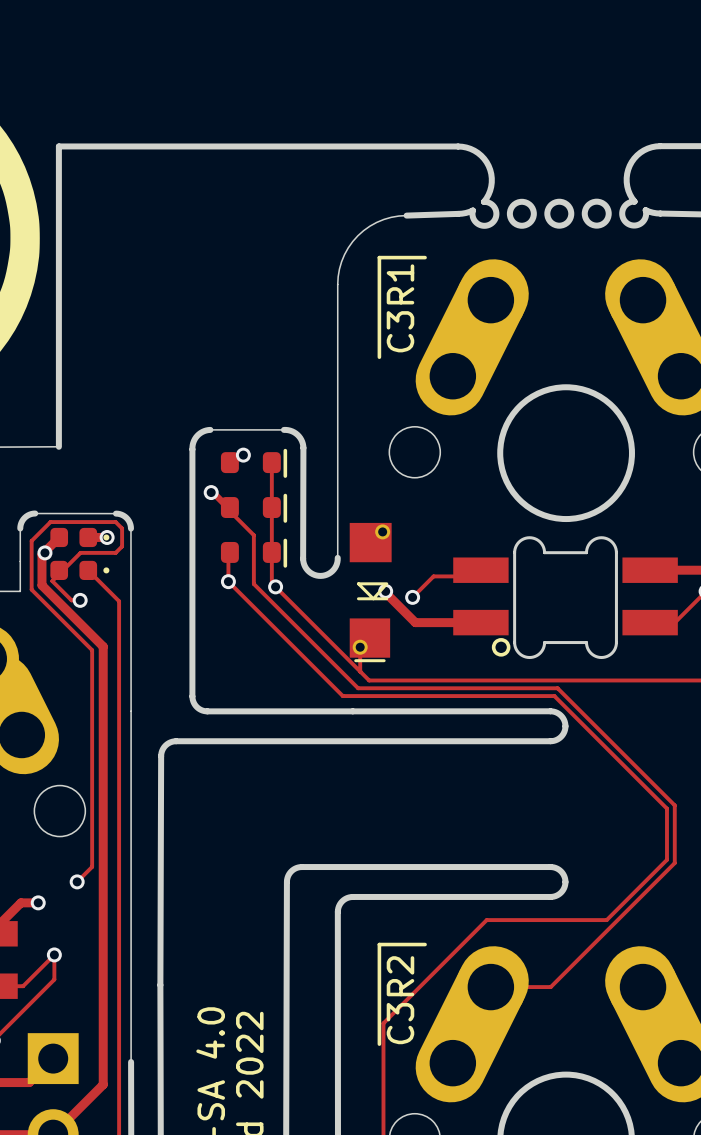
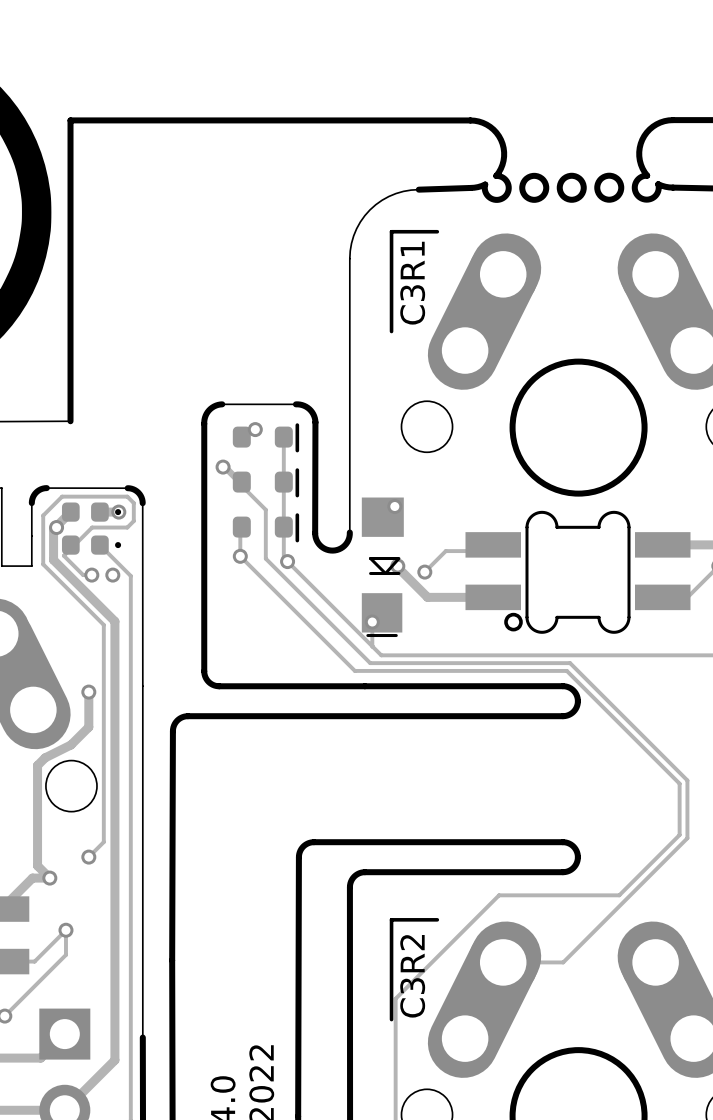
via: none -> (112, 575)
track: none -> (88, 692) (88, 727) (71, 744) (45, 757) (37, 765) (37, 865) (49, 878)
via: none -> (88, 692)

